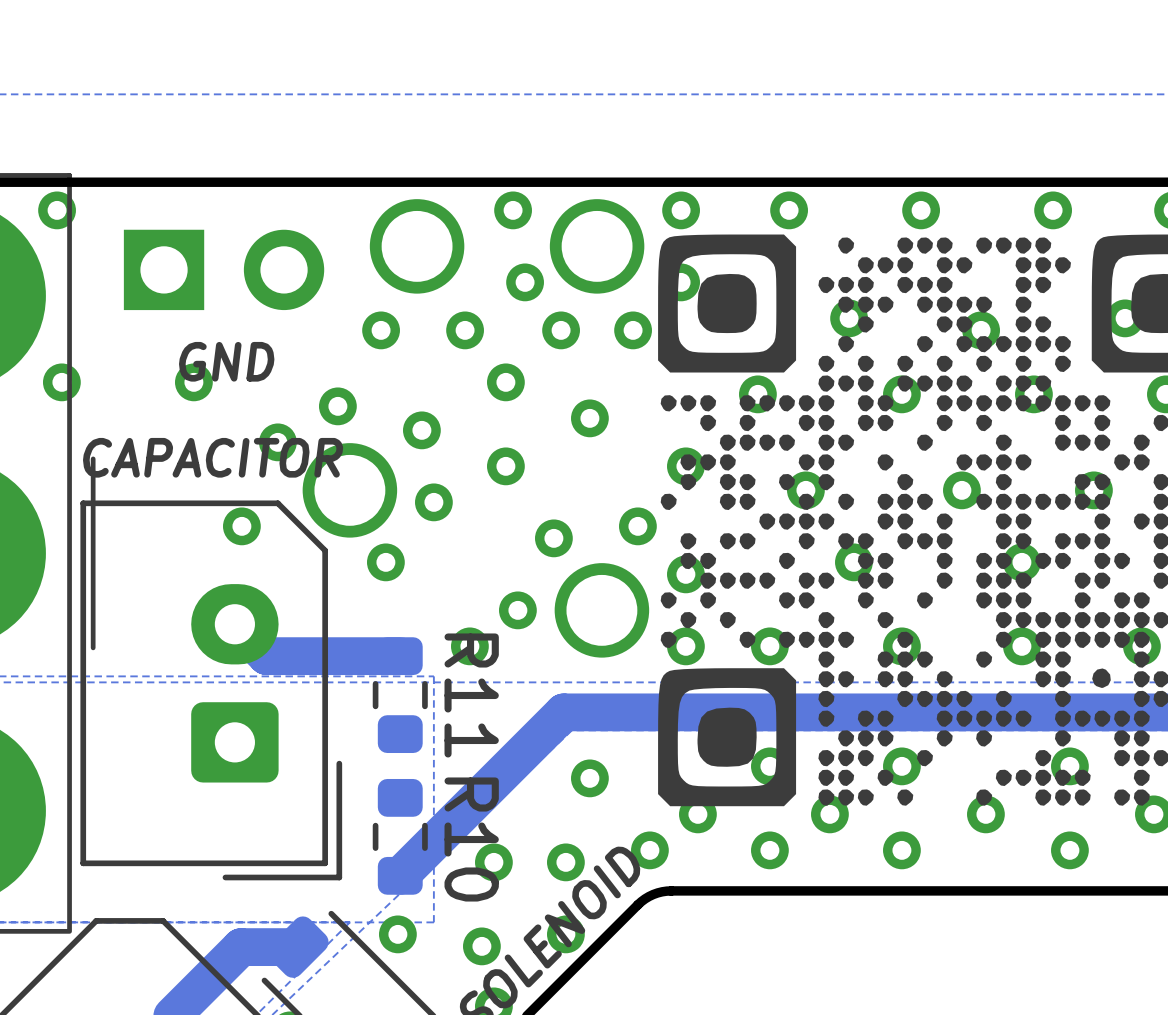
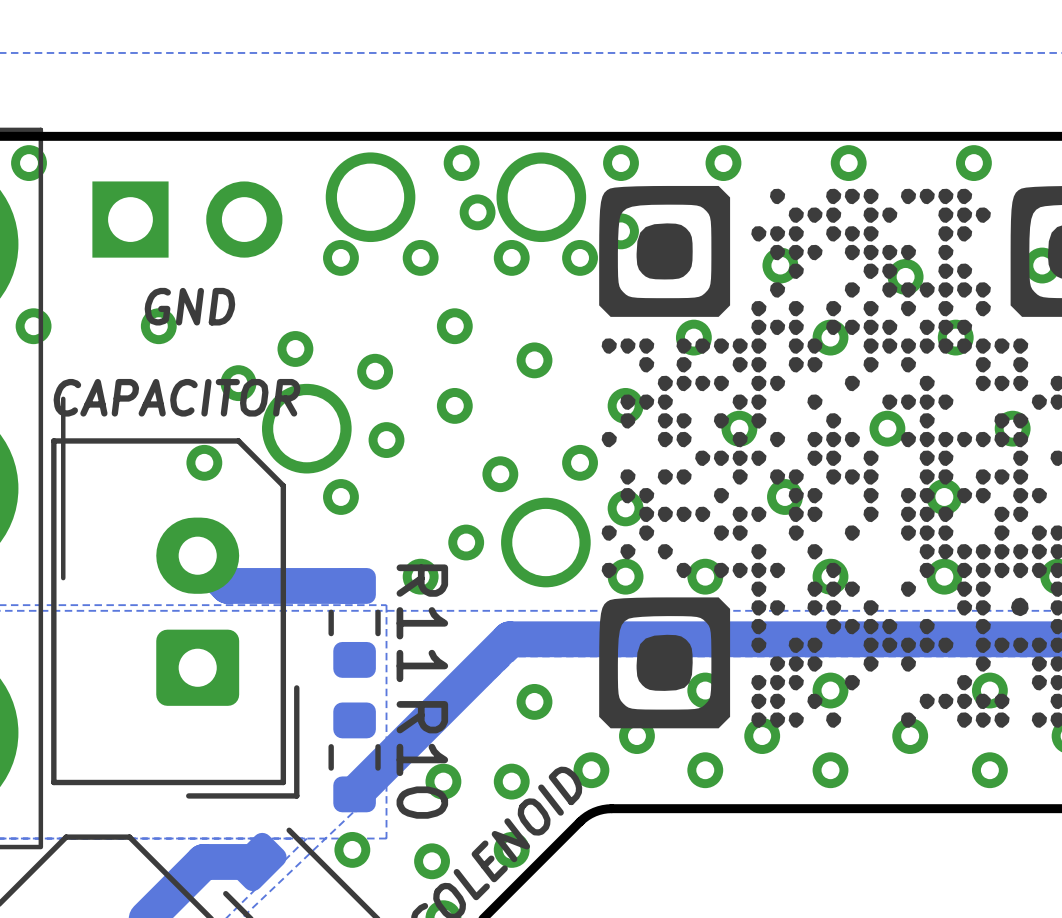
via position: (525, 282) -> (477, 212)
via position: (381, 330) -> (340, 257)
via position: (465, 330) -> (420, 257)
via position: (561, 330) -> (511, 257)
via position: (633, 330) -> (580, 257)

